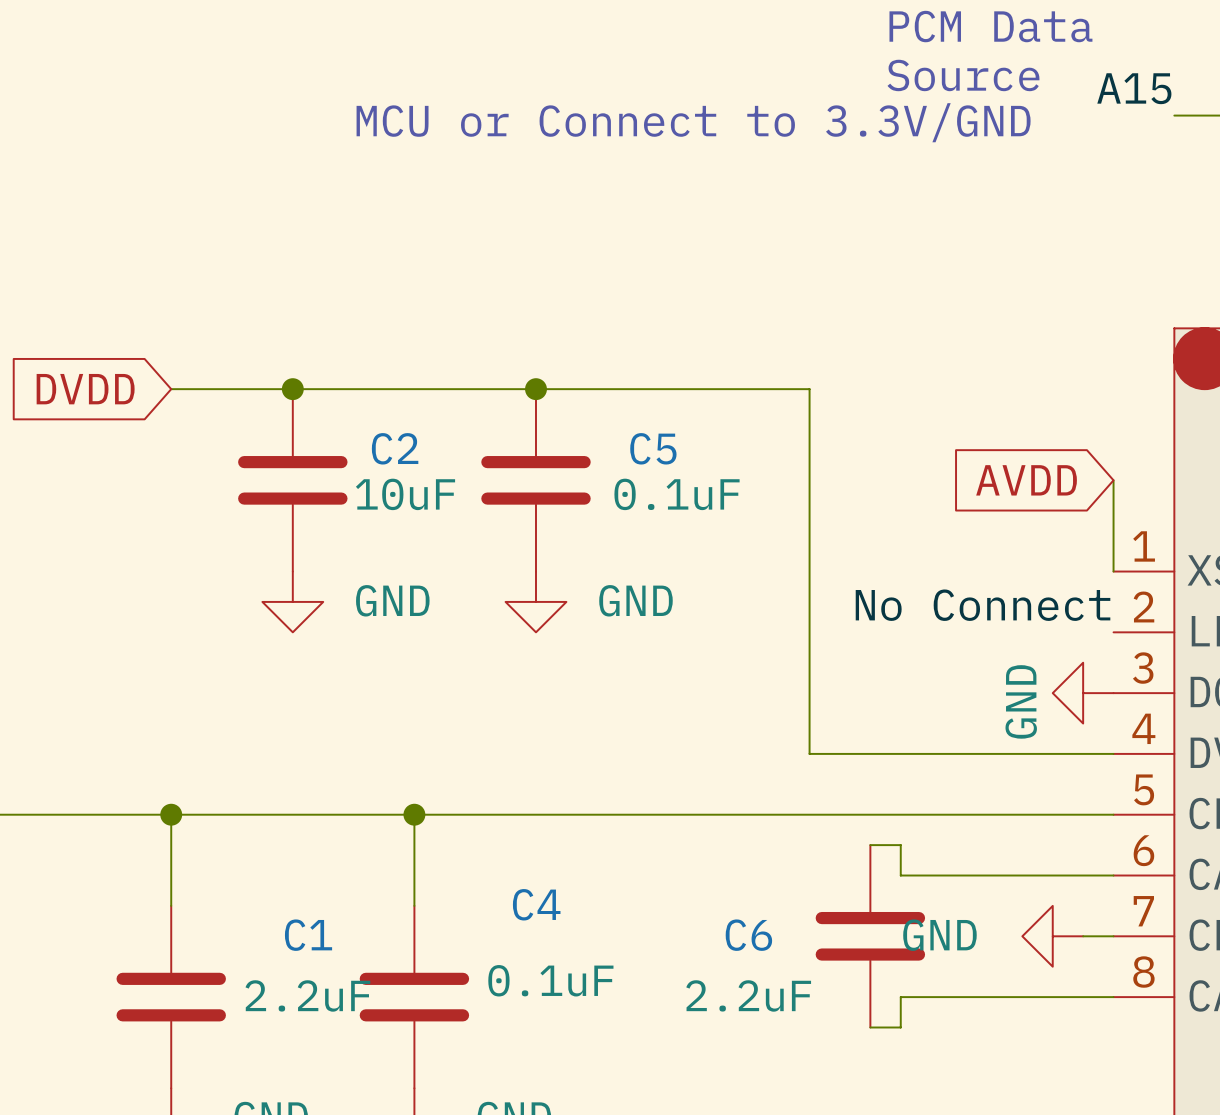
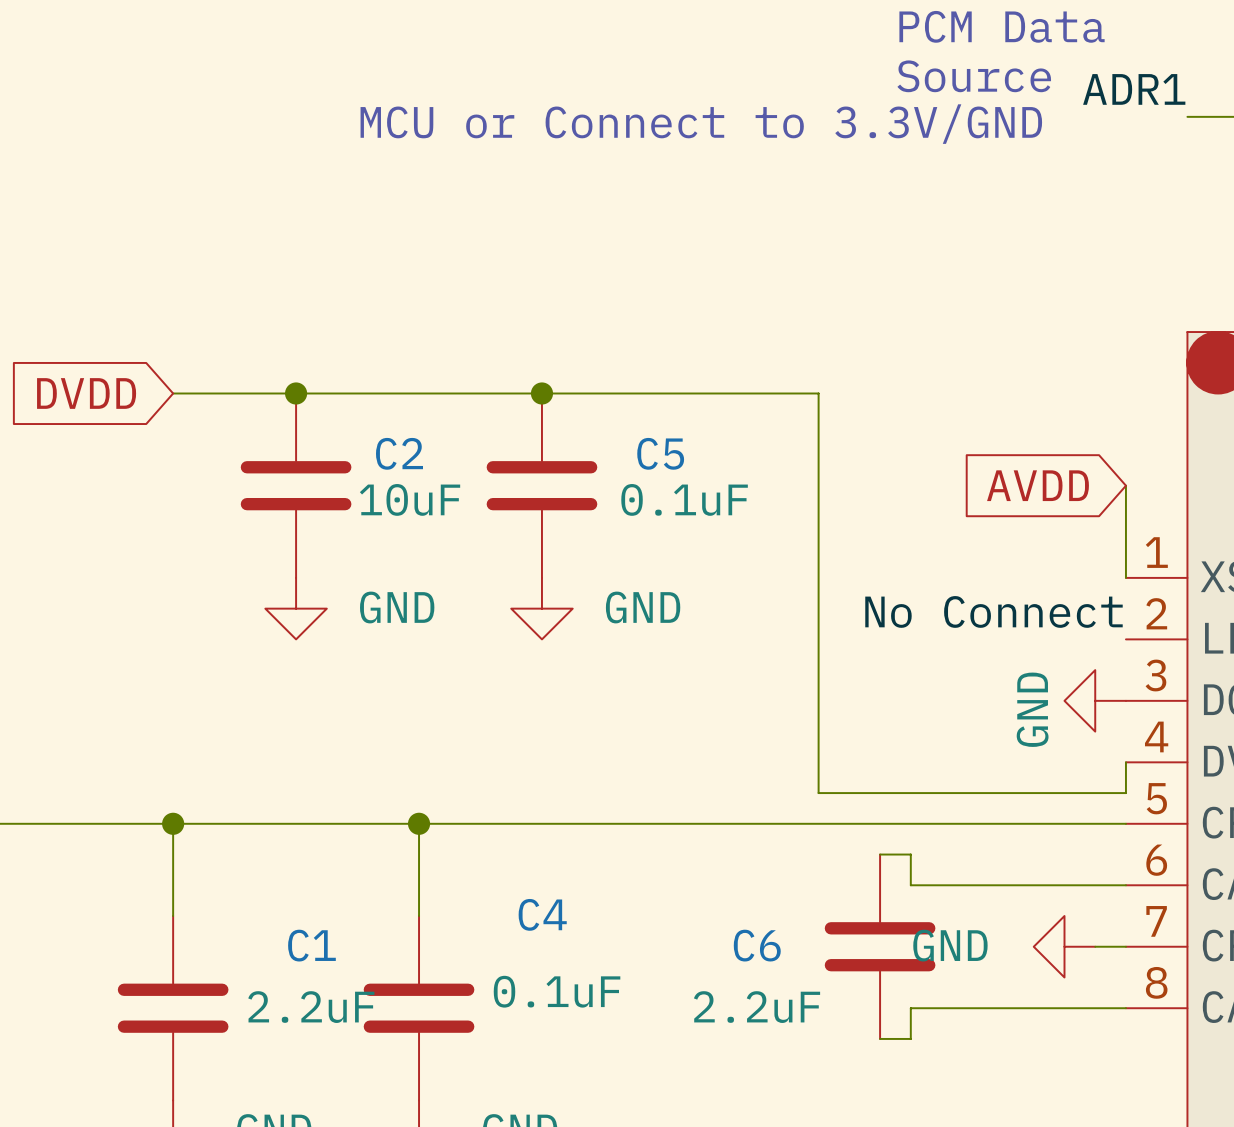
label: A15 (1134, 88) -> ADR1 (1134, 89)
wire: (809, 753) (1113, 753) -> (818, 762) (818, 793) (1125, 793) (1125, 762)

